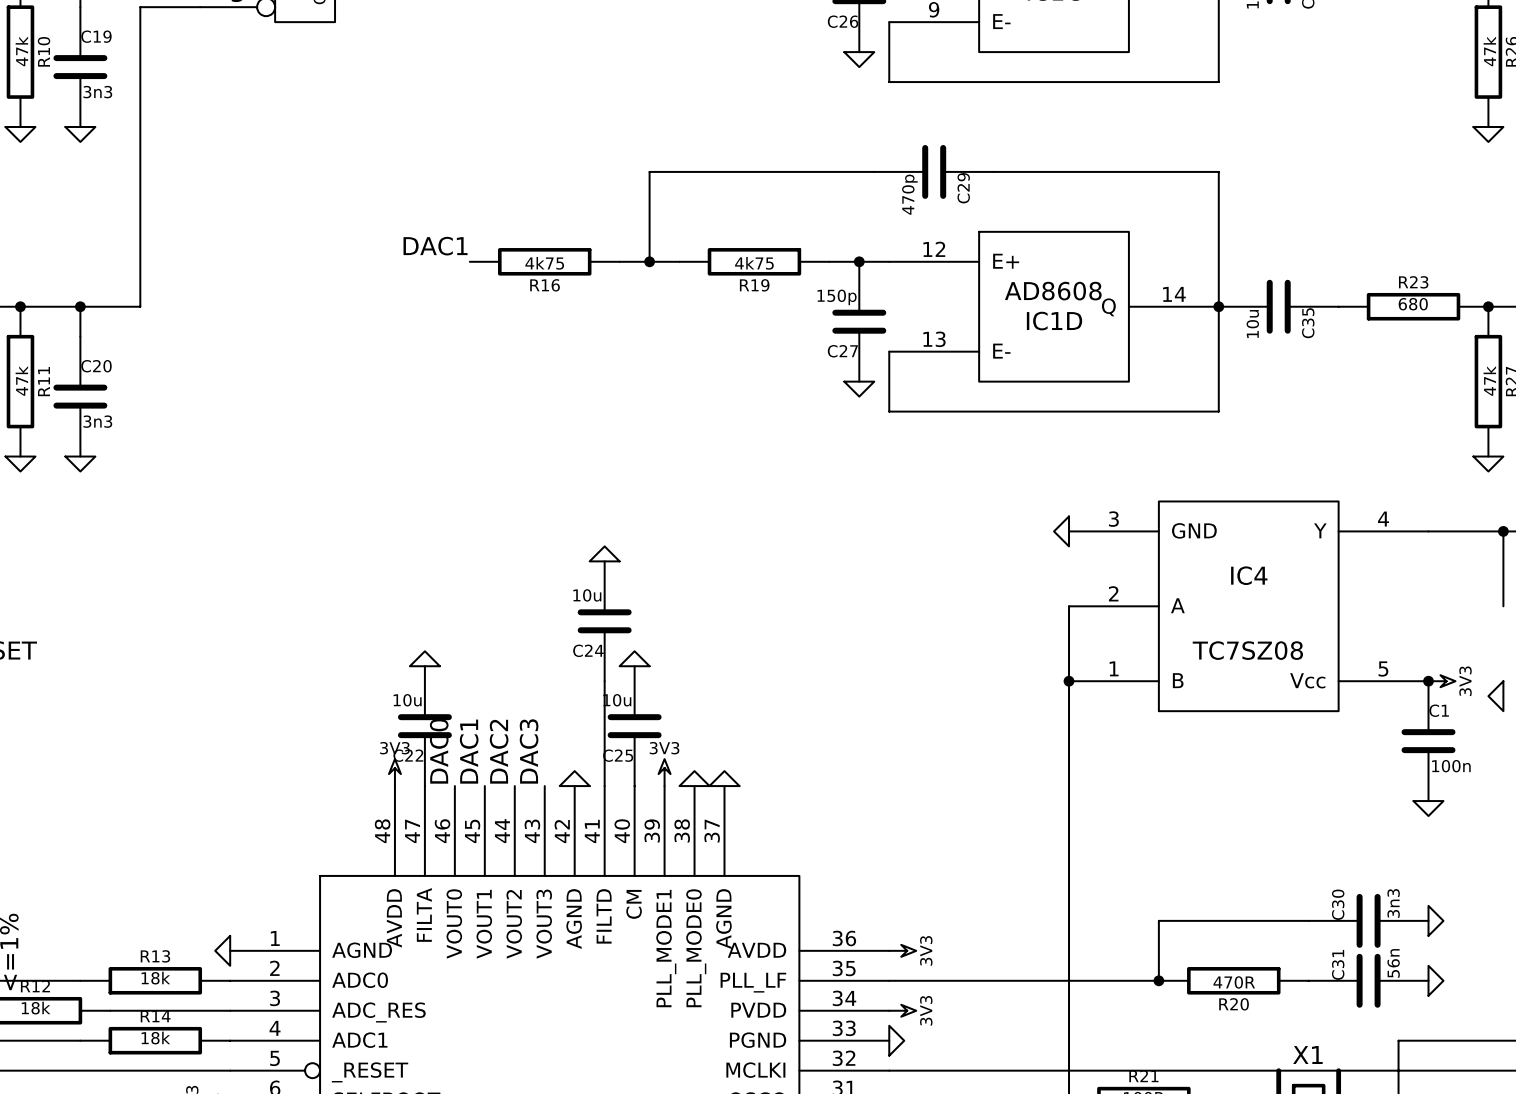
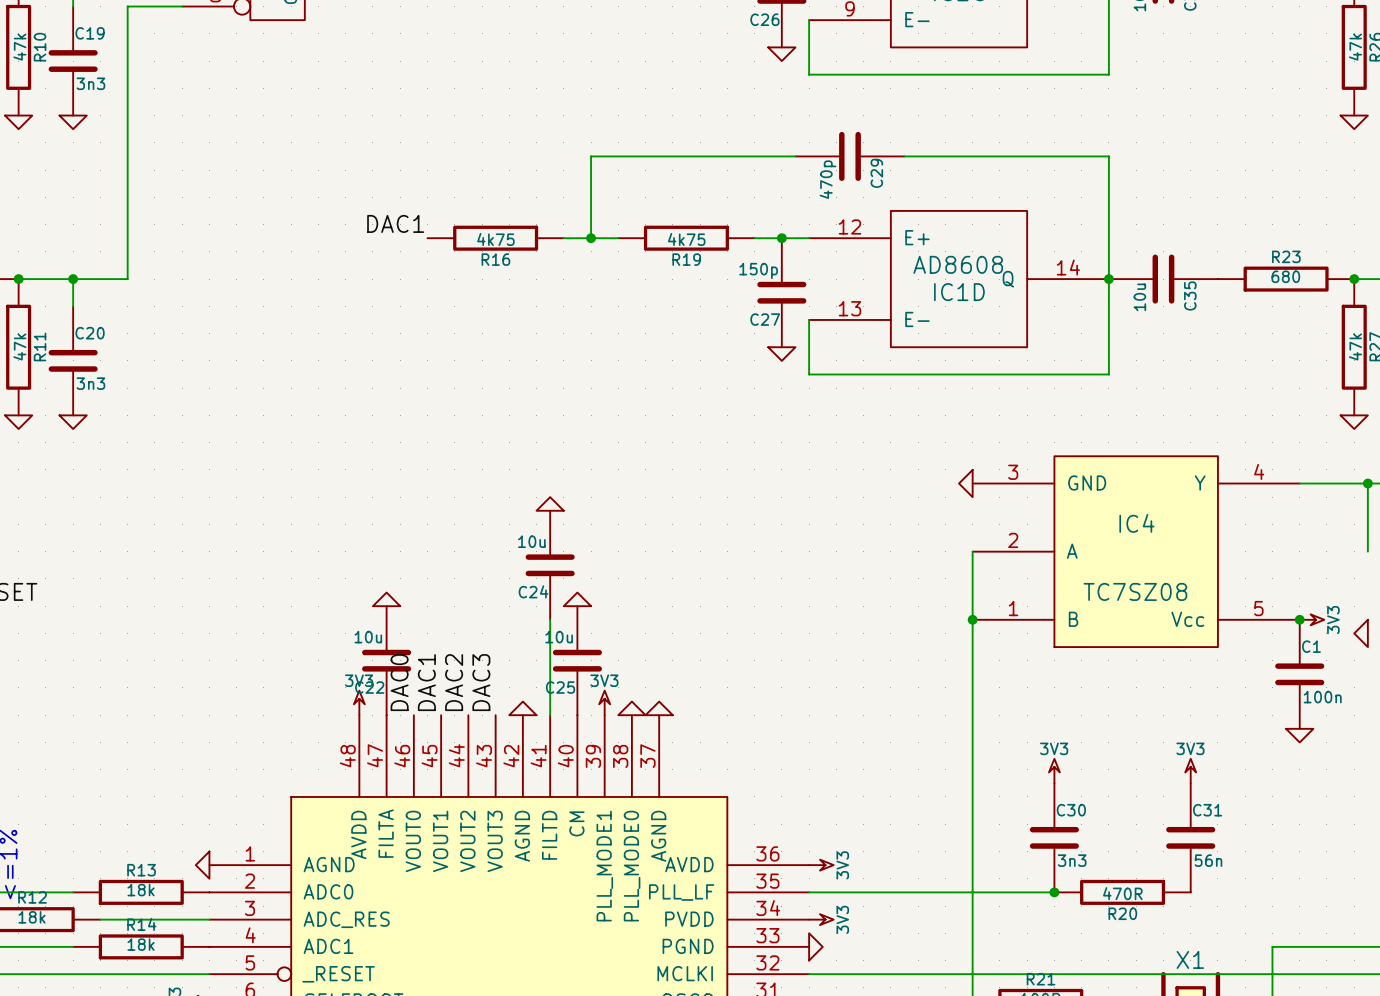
power symbol: none -> 3V3 (1054, 771)
power symbol: none -> 3V3 (1190, 771)
wire: (1308, 920) (1158, 920) (1158, 980) -> none
C30 rotation: 0° (1368, 920) -> 90° clockwise (1054, 837)
C30 position: (1368, 920) -> (1054, 837)
power symbol: (1435, 920) -> none
C31 rotation: 0° (1368, 980) -> 90° clockwise (1190, 837)
C31 position: (1368, 980) -> (1190, 837)
power symbol: (1435, 980) -> none

